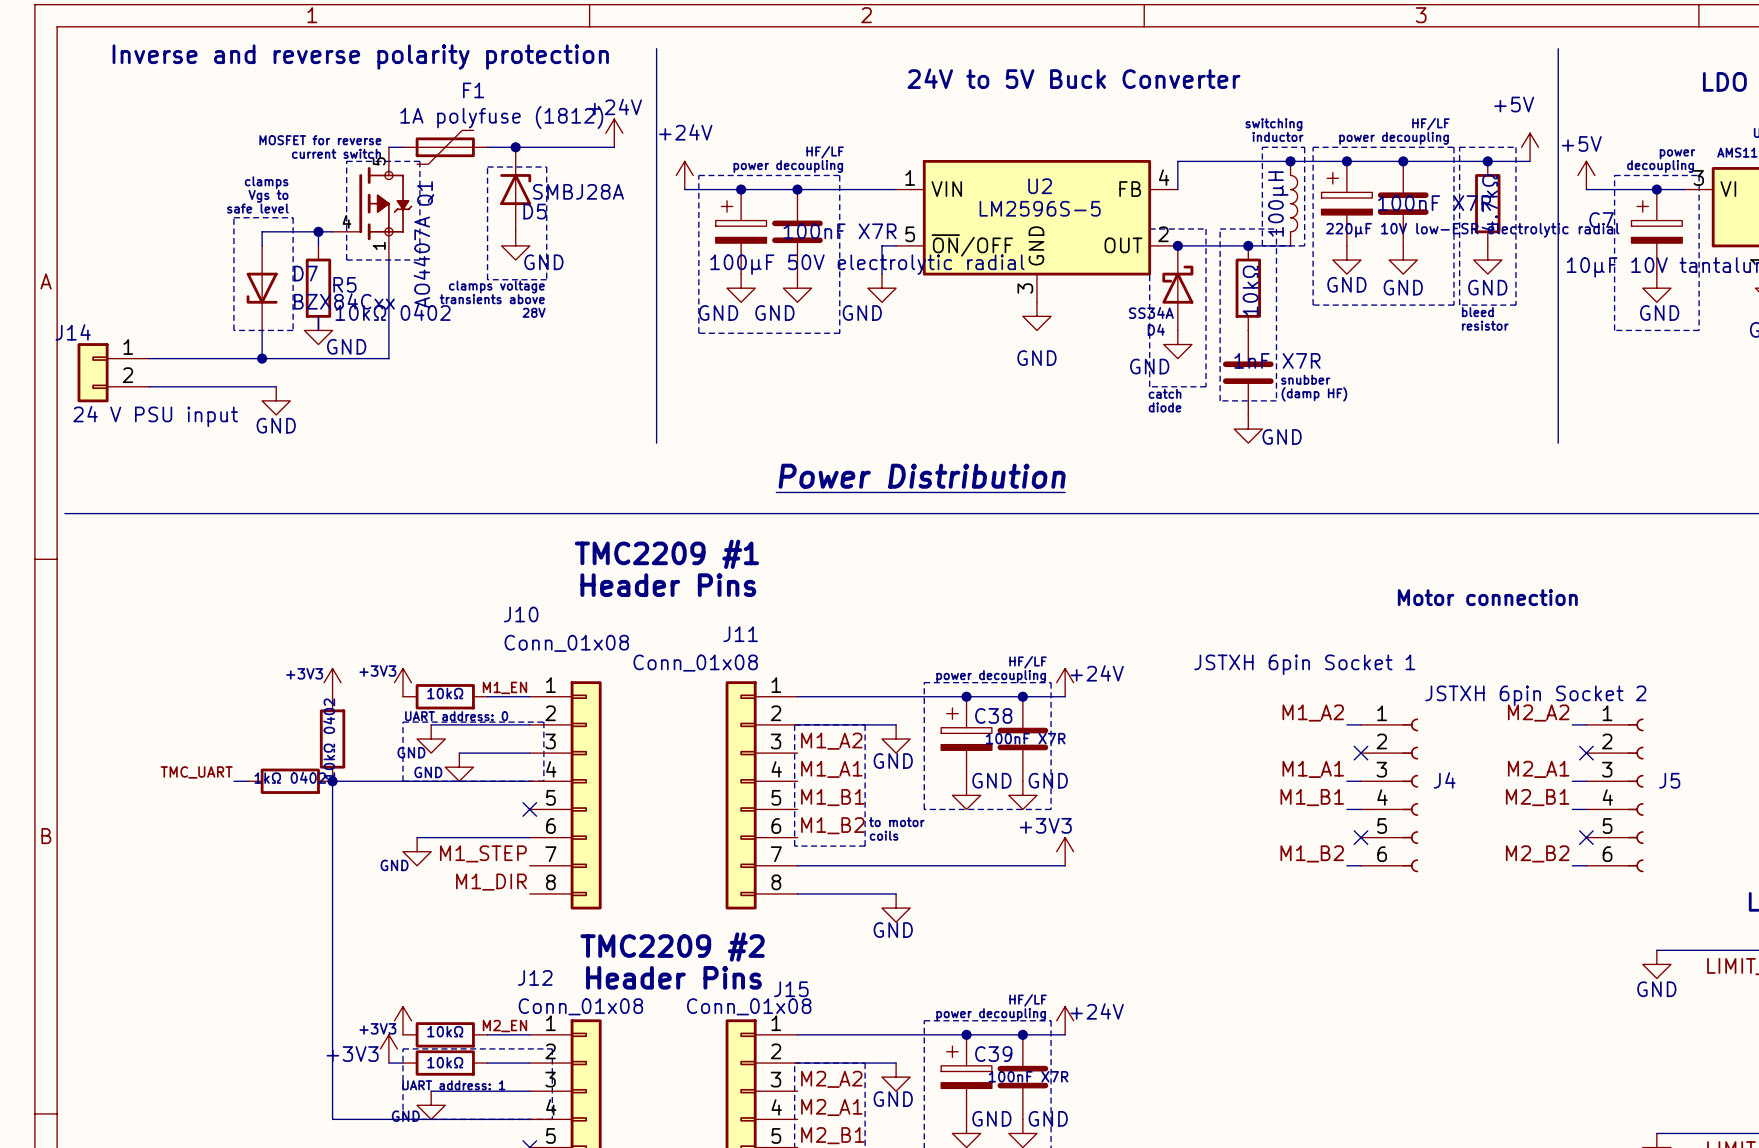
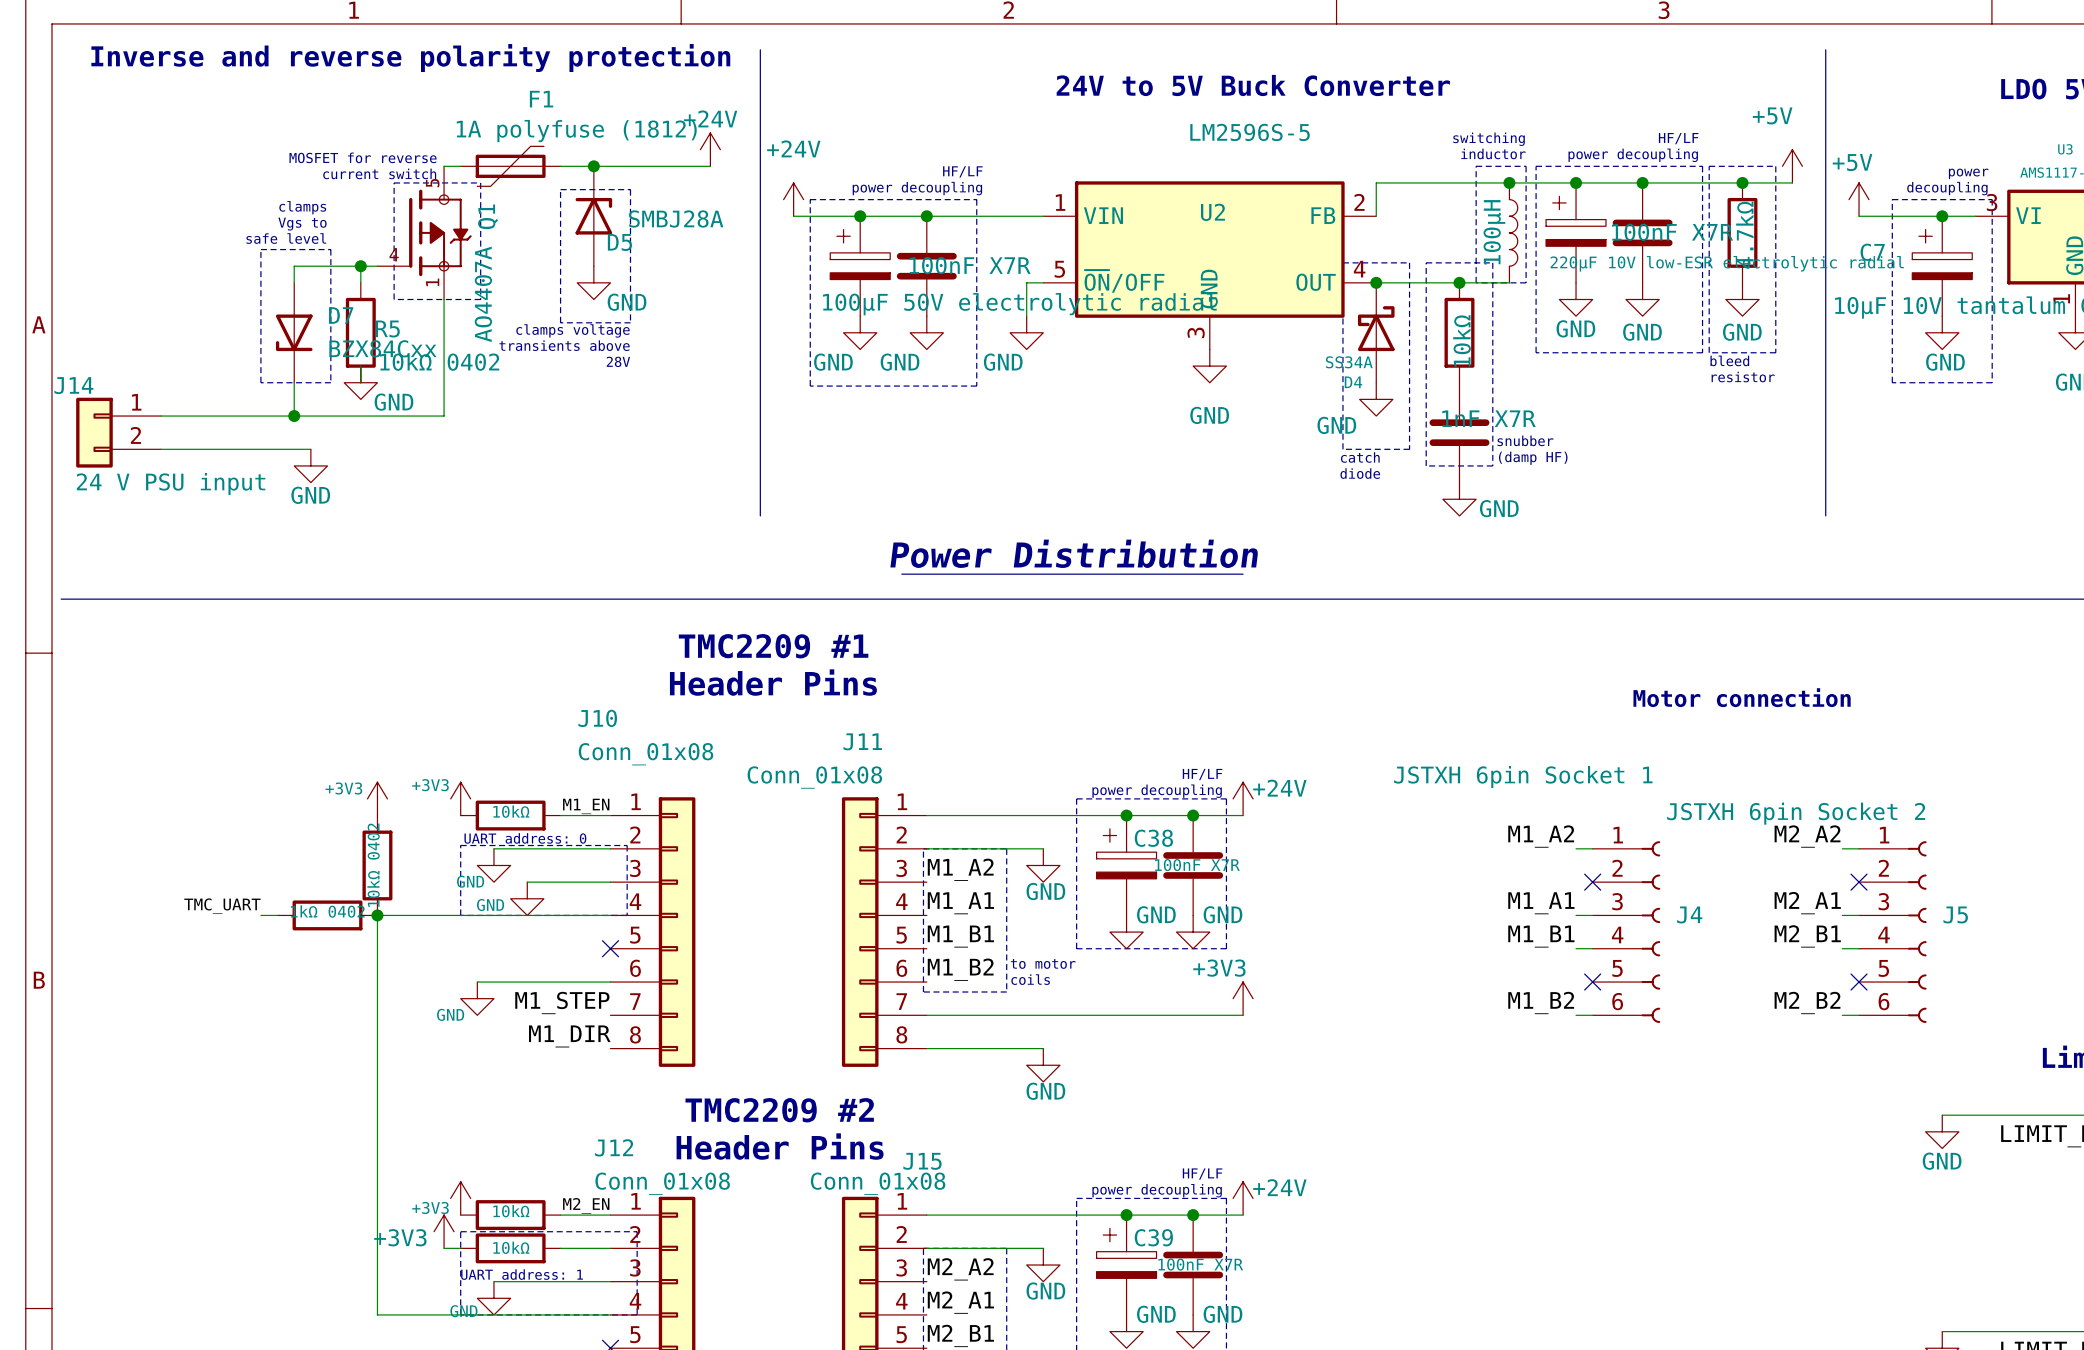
U2 pin number: 4 (1164, 177) -> 2 (1359, 202)
U2 value position: LM2596S-5 (1040, 208) -> LM2596S-5 (1250, 132)
U2 pin number: 2 (1163, 234) -> 4 (1359, 269)

